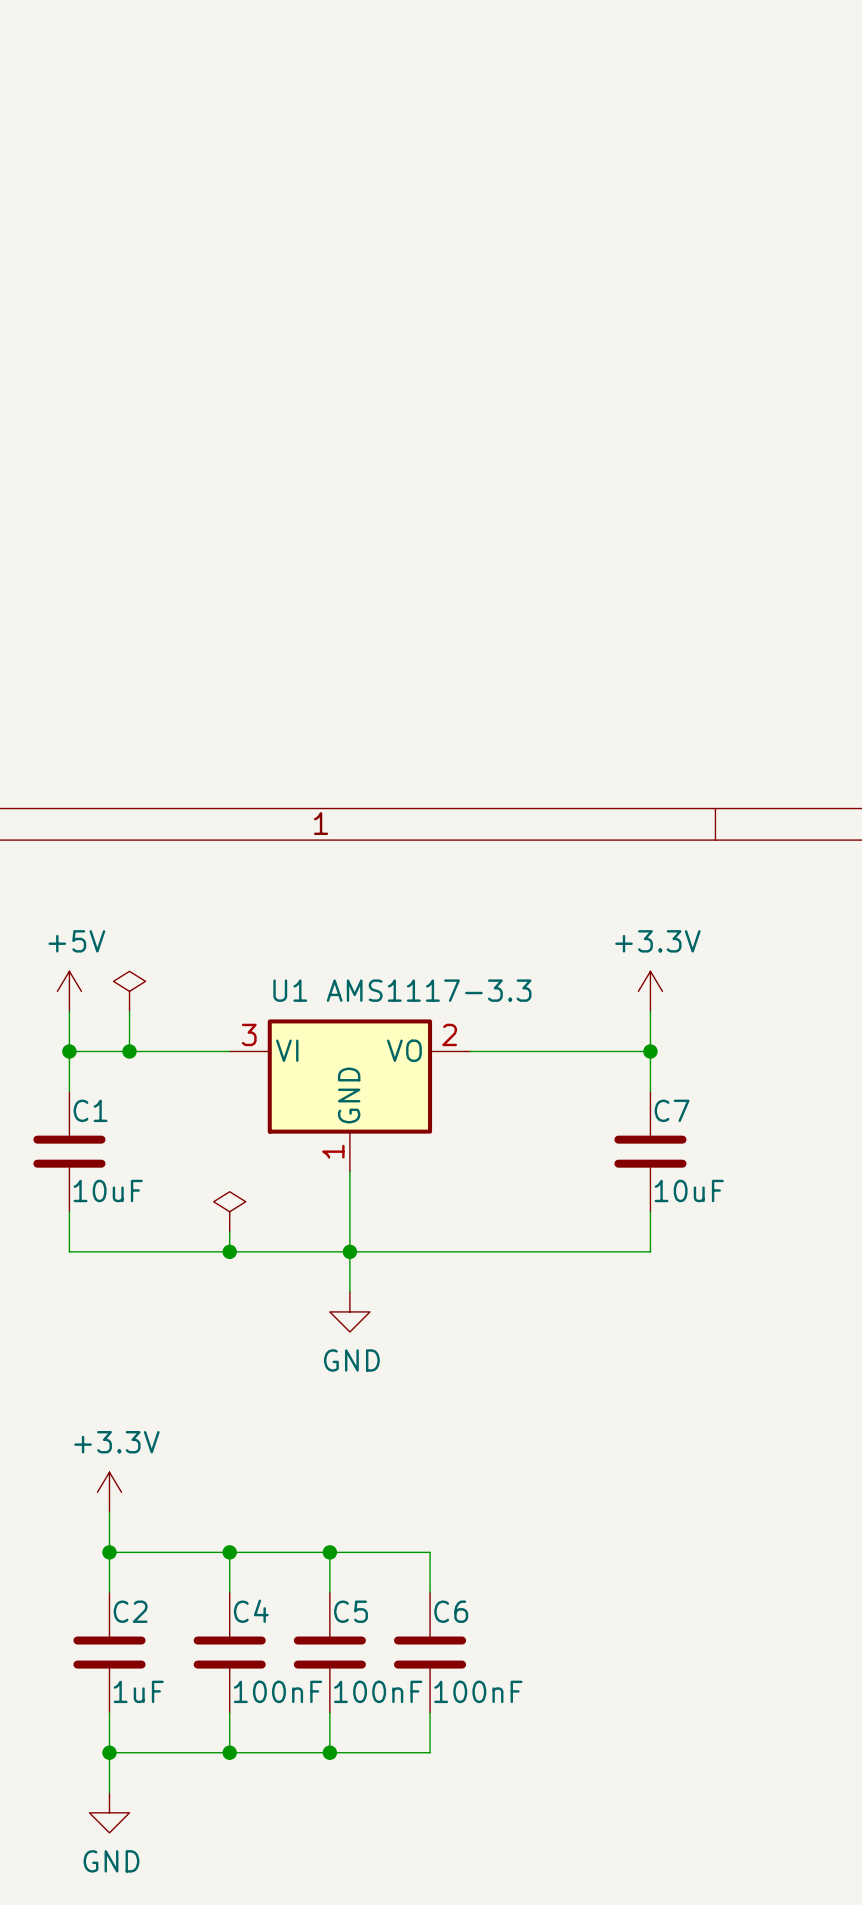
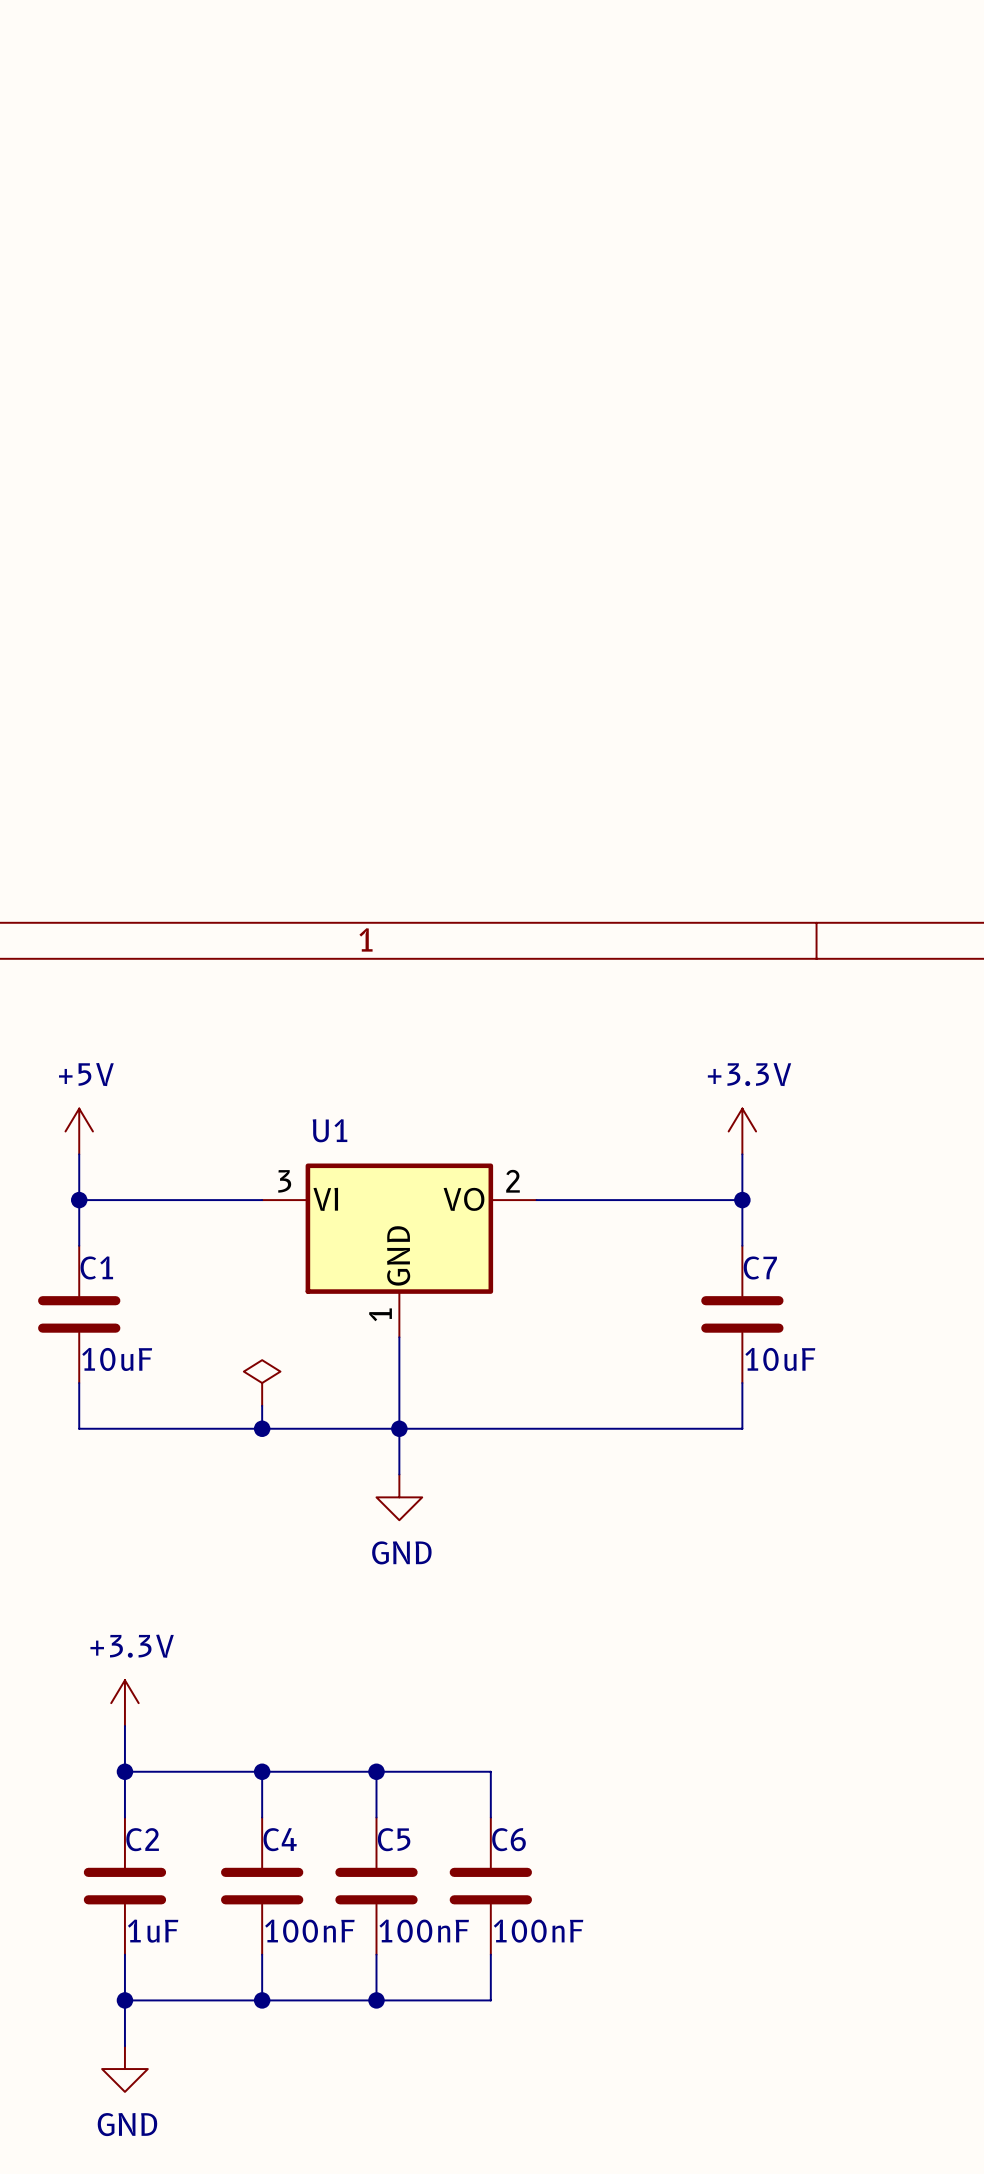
U1 value: AMS1117-3.3 (429, 990) -> none
power symbol: (129, 991) -> none
wire: (129, 1011) (129, 1051) -> none
junction: (129, 1051) -> none

